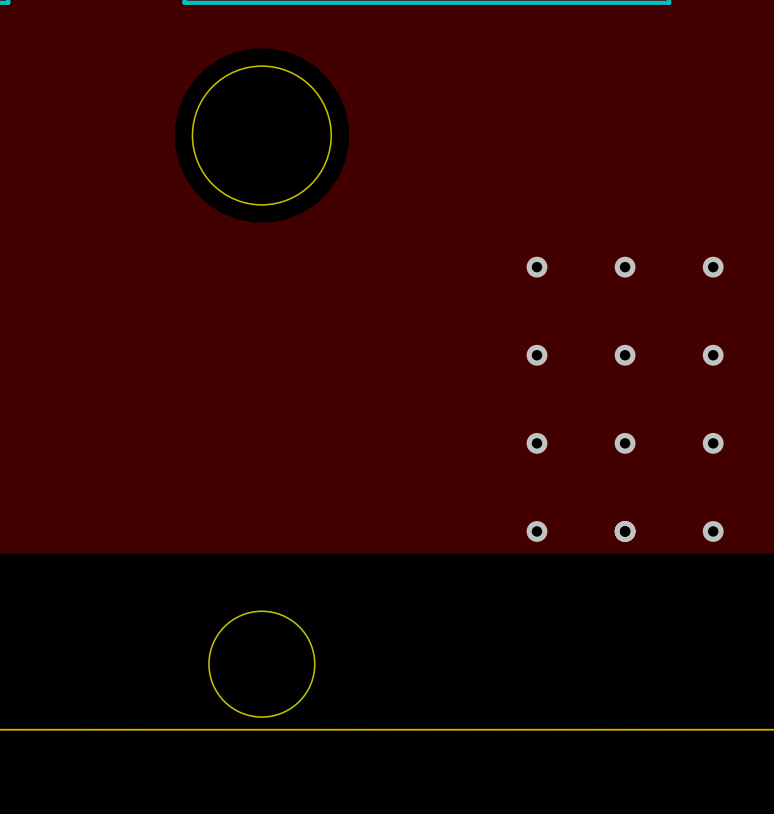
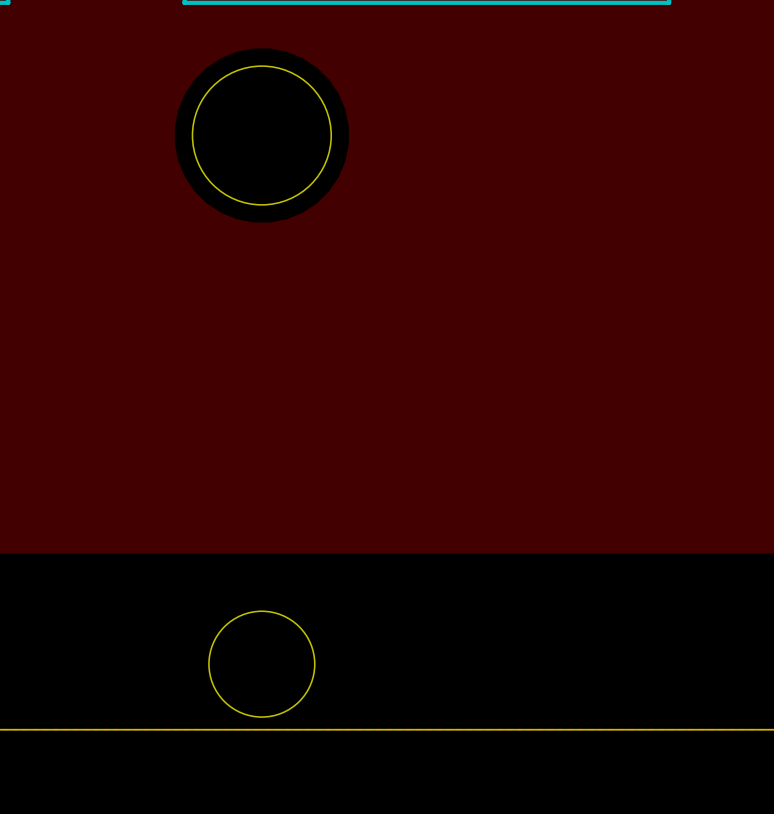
via: (536, 267) -> none
via: (625, 267) -> none
via: (713, 267) -> none
via: (536, 355) -> none
via: (625, 355) -> none
via: (713, 355) -> none
via: (536, 443) -> none
via: (625, 443) -> none
via: (713, 443) -> none
via: (536, 531) -> none
via: (625, 531) -> none
via: (713, 531) -> none

